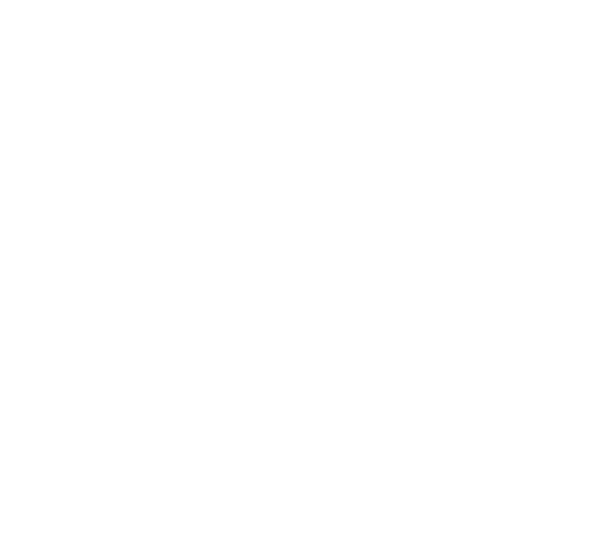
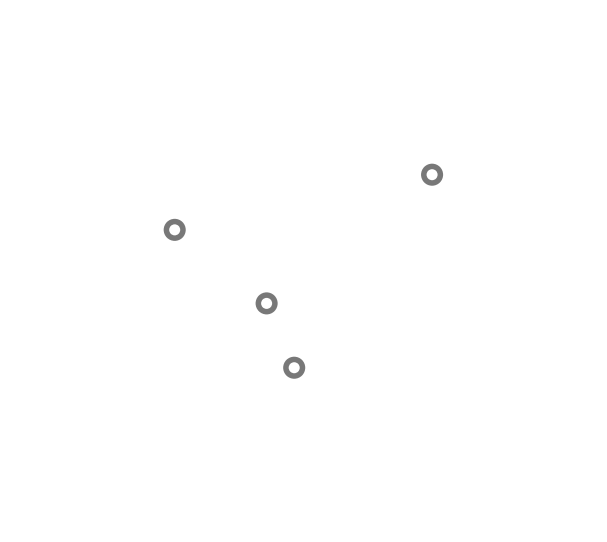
via: none -> (432, 174)
via: none -> (174, 229)
via: none -> (266, 303)
via: none -> (294, 367)

